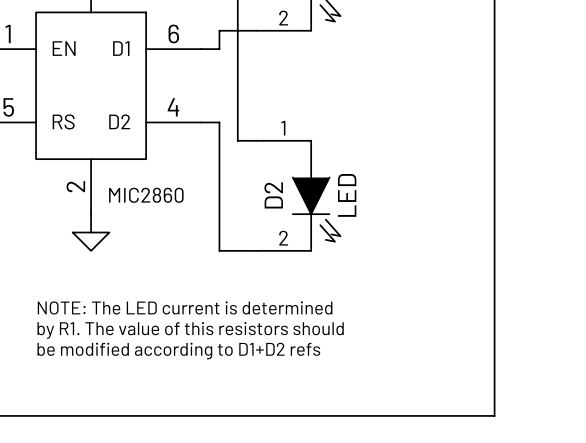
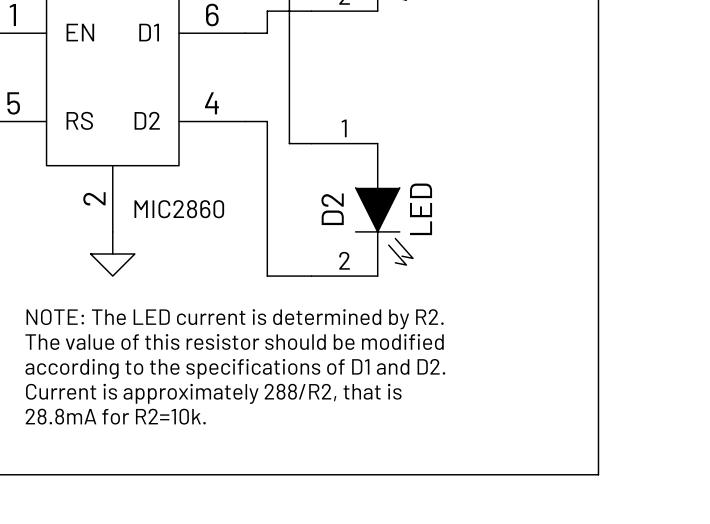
text: NOTE: The LED current is determined (185, 307) -> NOTE: The LED current is determined by R2. (235, 319)
text: none -> according to the specifications of D1 and D2. (235, 368)
text: by R1. The value of this resistors should (190, 330) -> The value of this resistor should be modified (234, 342)
text: none -> Current is approximately 288/R2, that is (213, 393)
text: be modified according to D1+D2 refs (178, 351) -> none
text: none -> 28.8mA for R2=10k. (115, 416)

